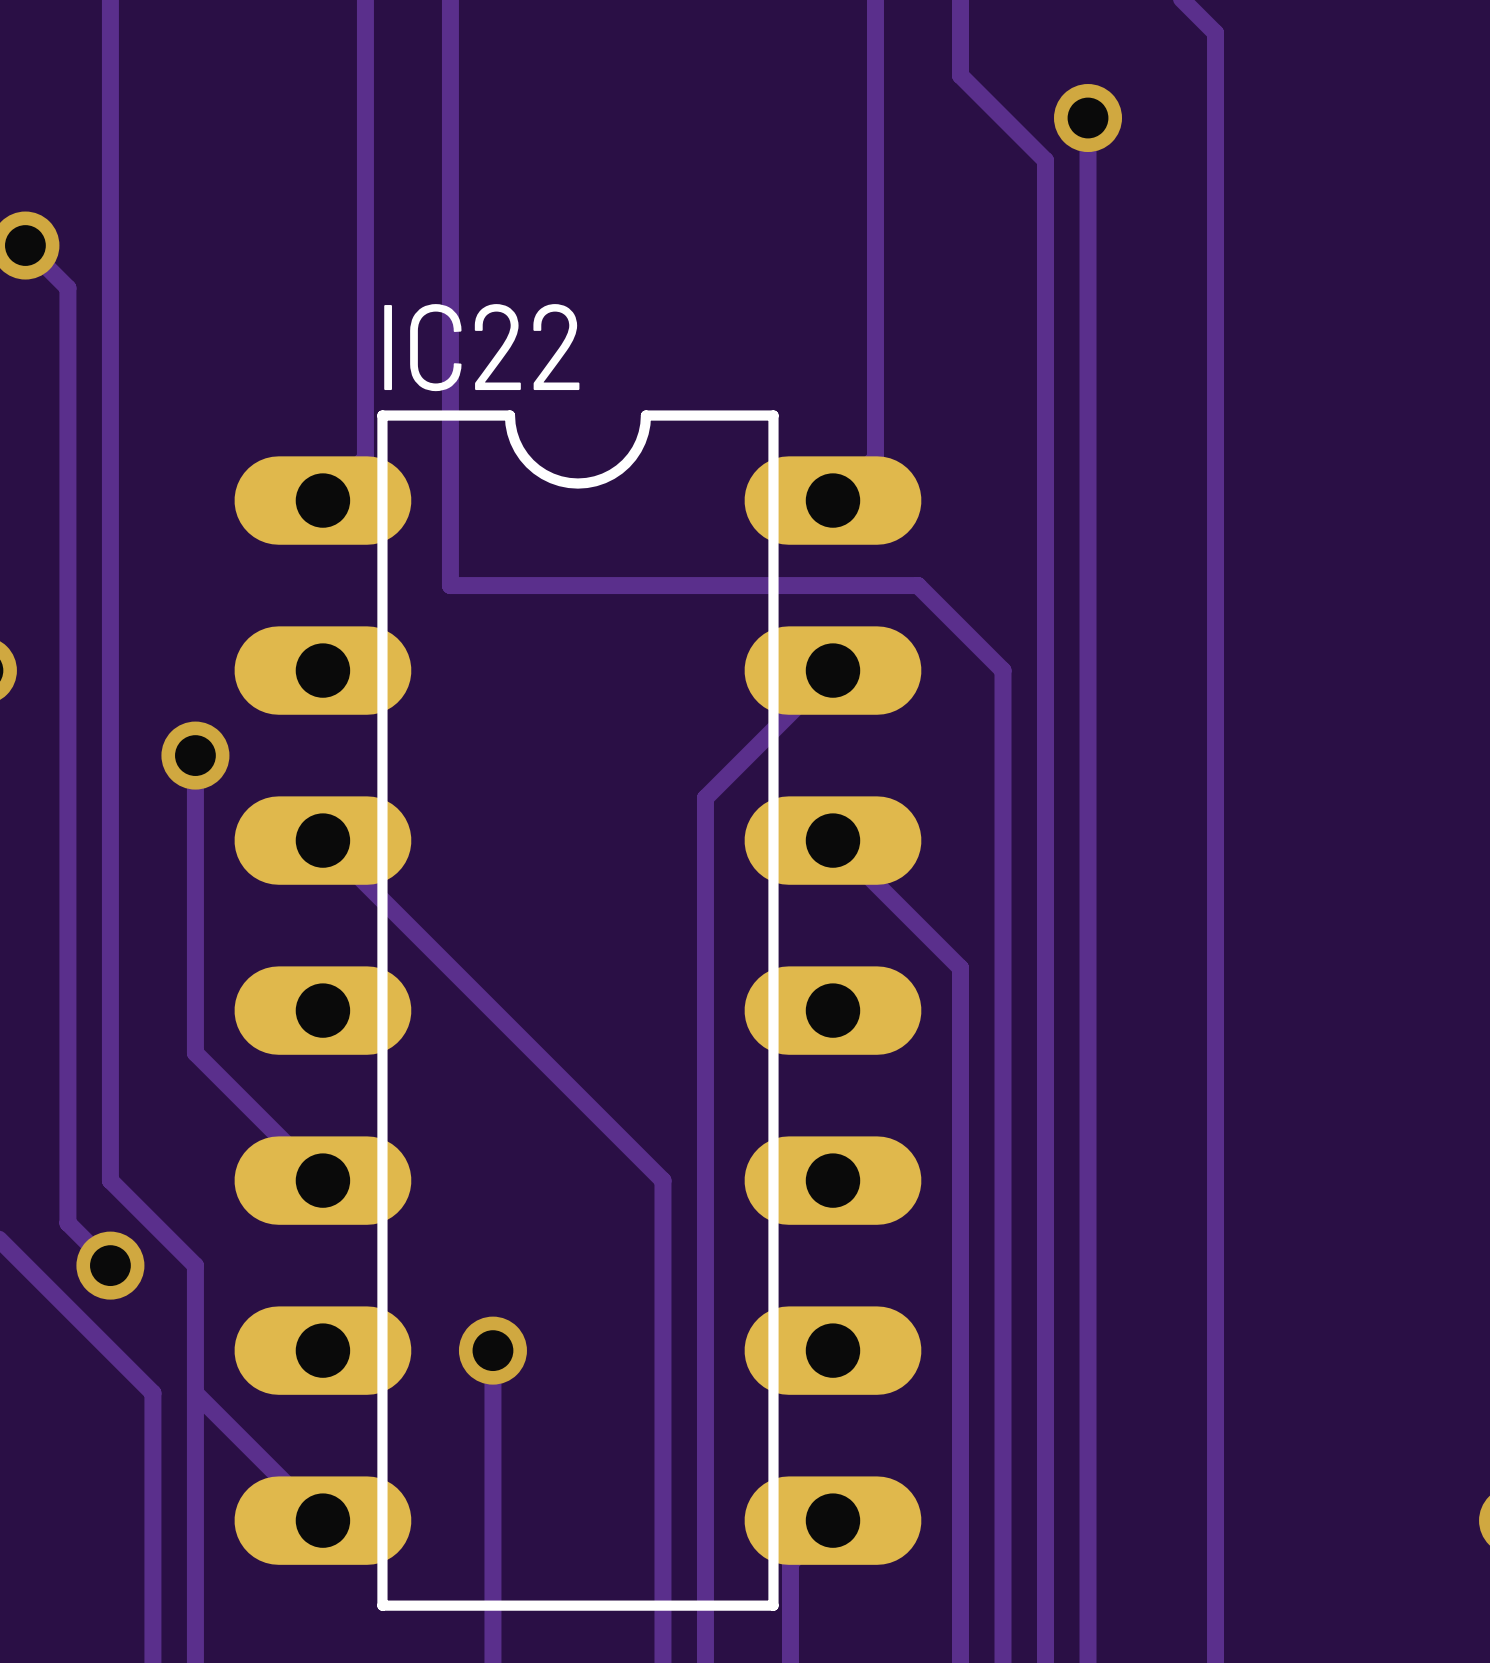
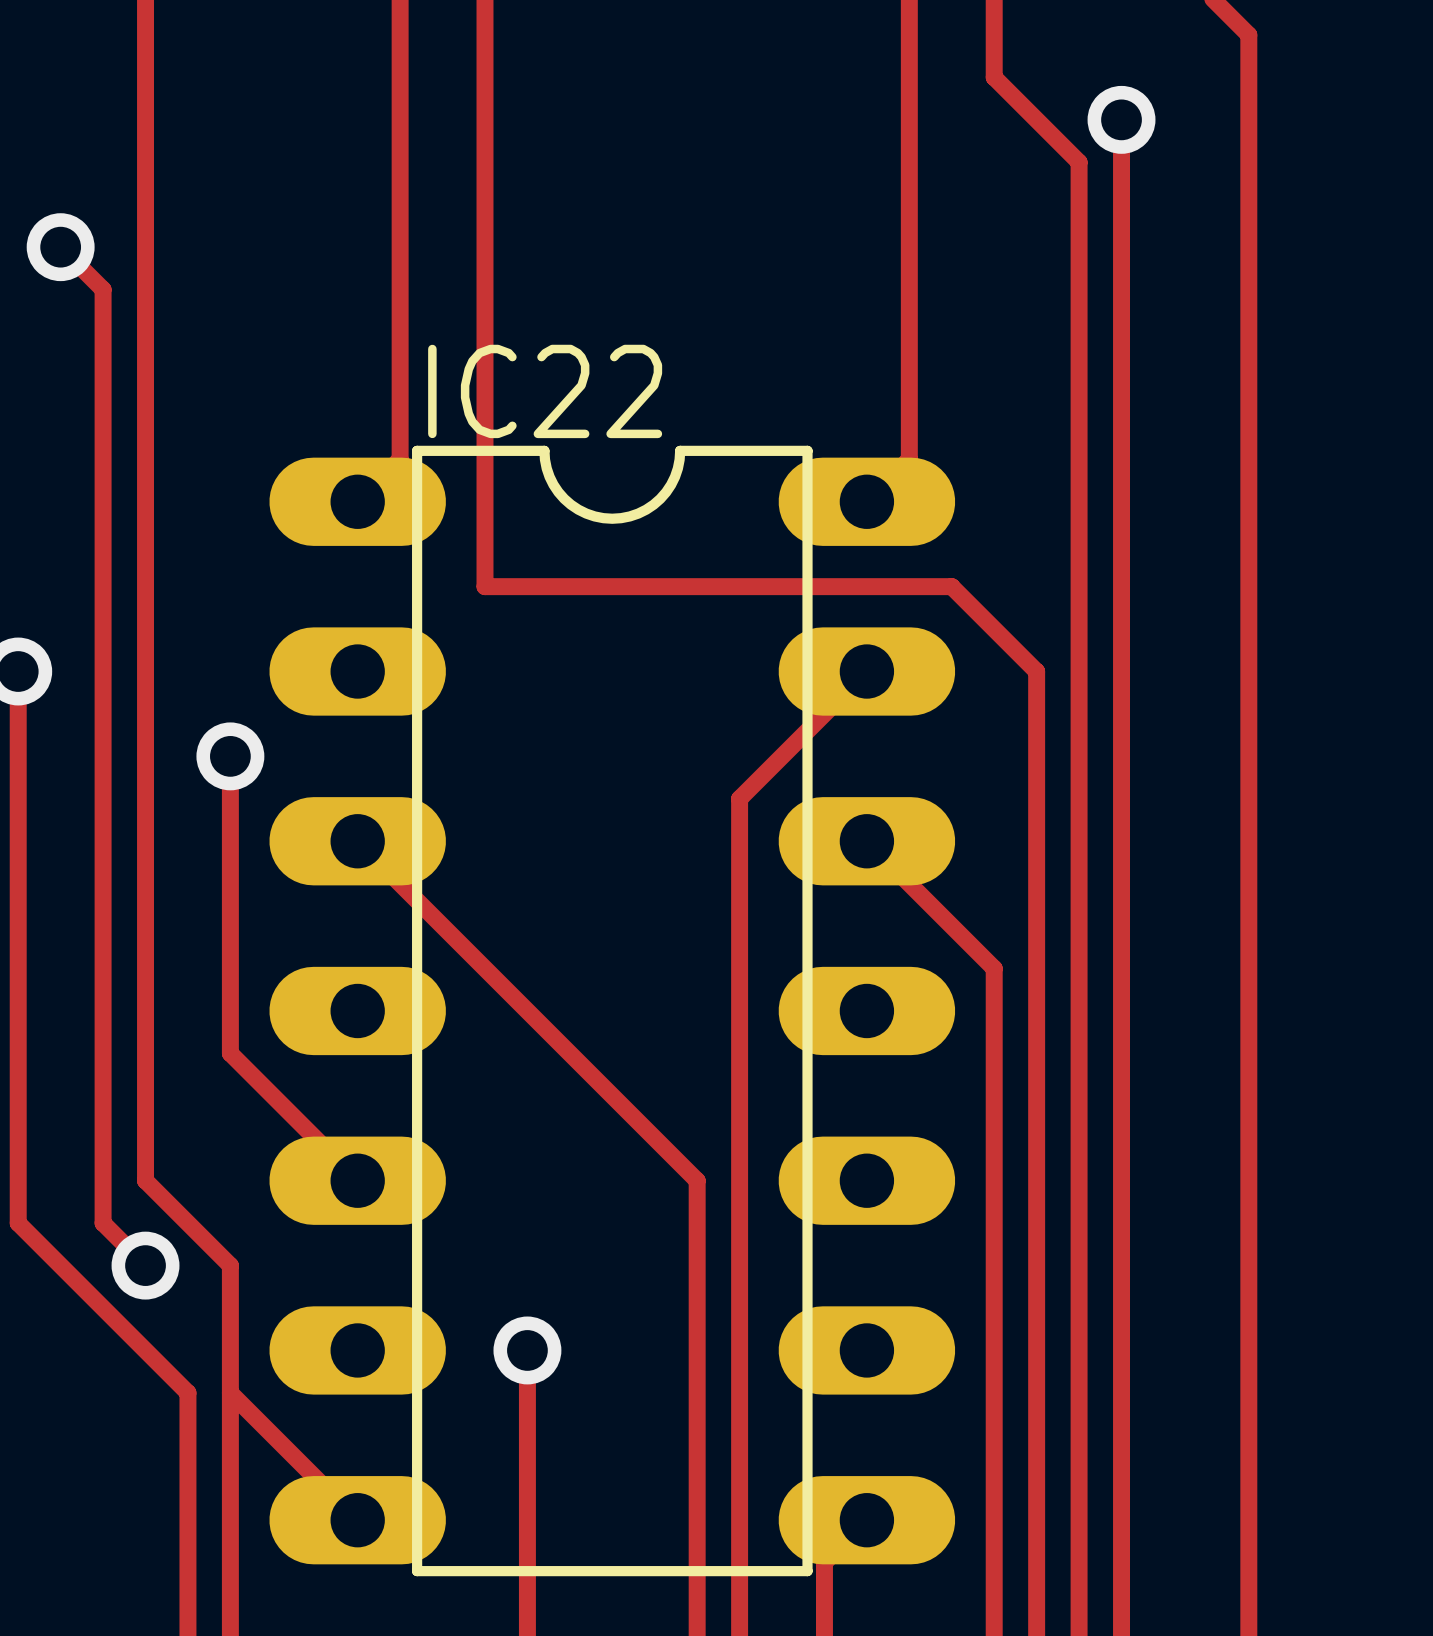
IC22 name position: IC22 (481, 347) -> IC22 (545, 391)
IC22 footprint: [234, 410, 922, 1611] -> [269, 445, 956, 1577]

